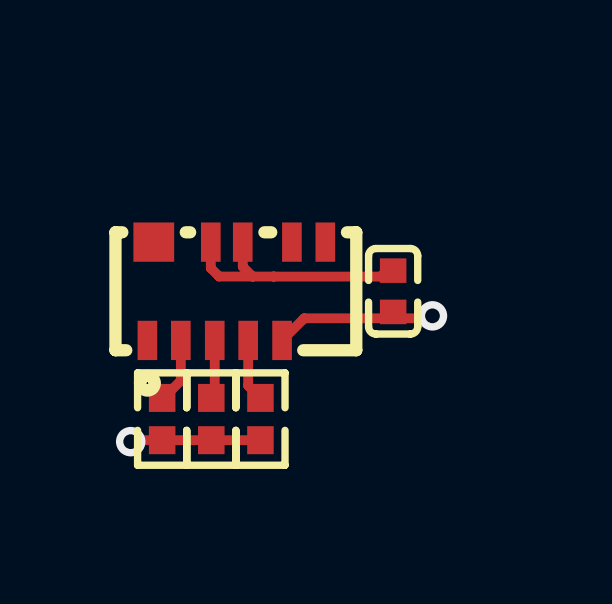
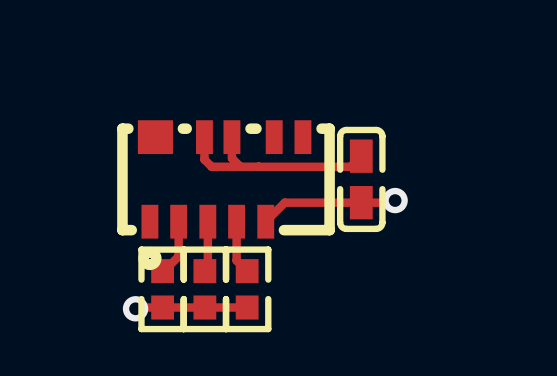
part footprint: [364, 244, 422, 338] -> [336, 126, 386, 233]

